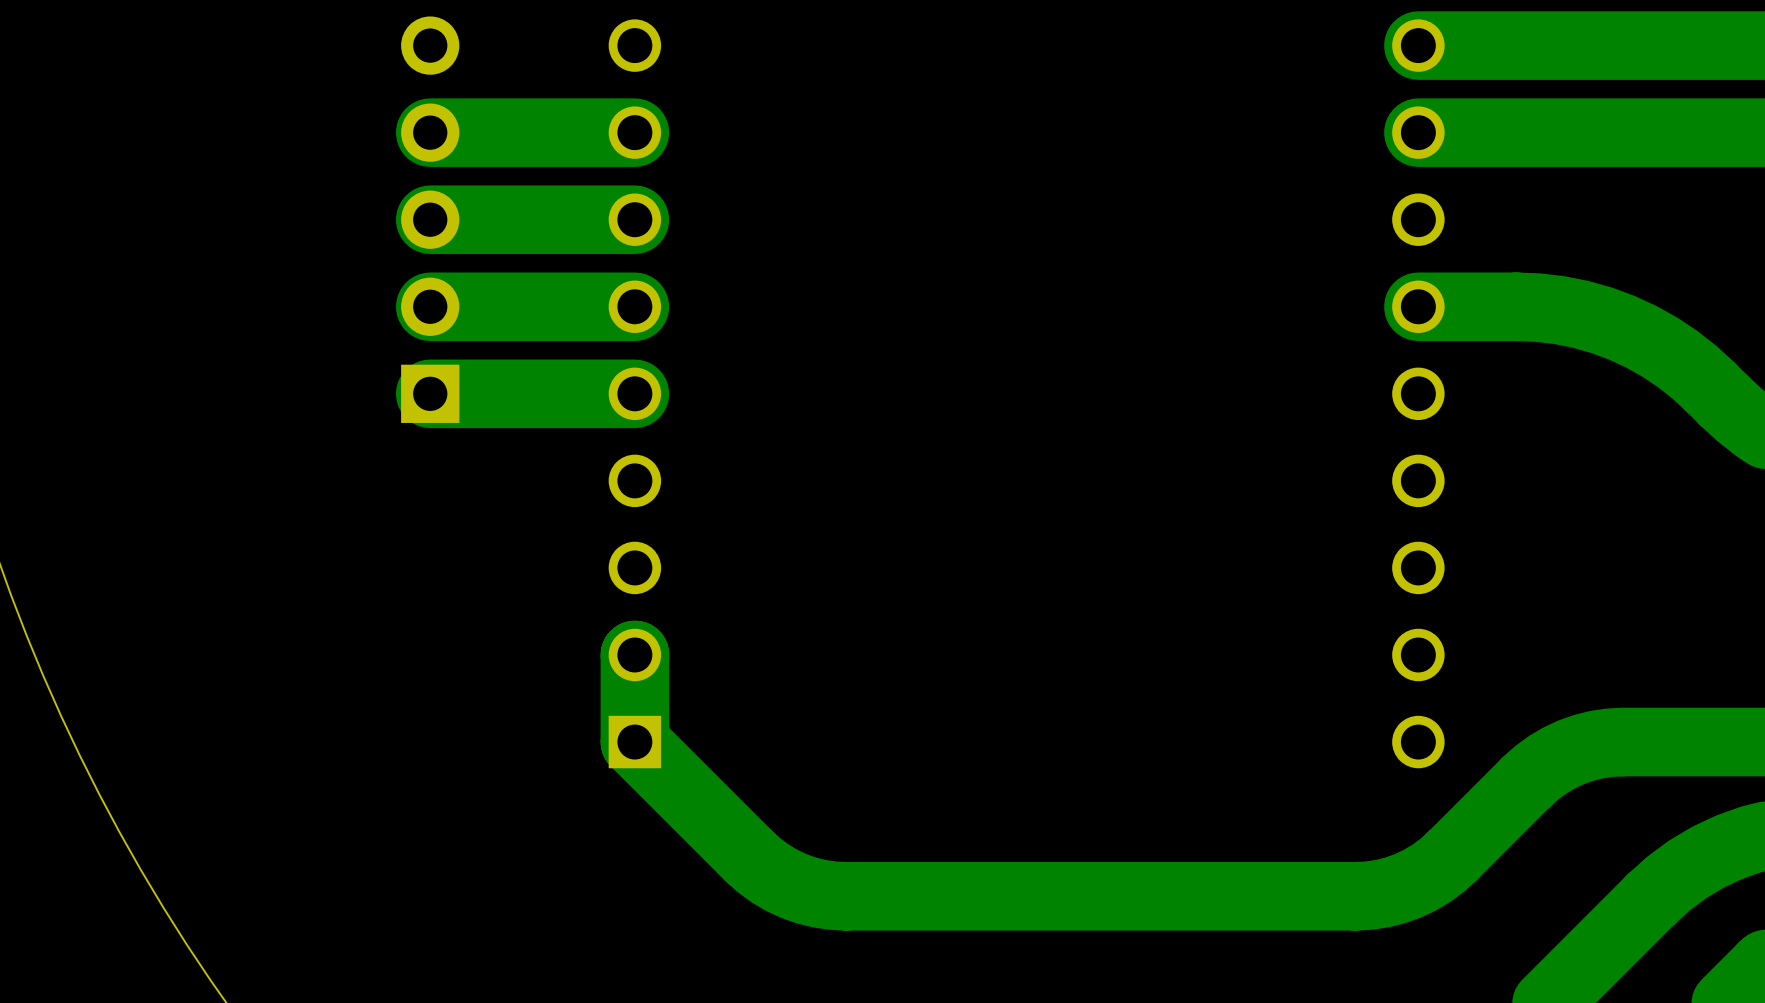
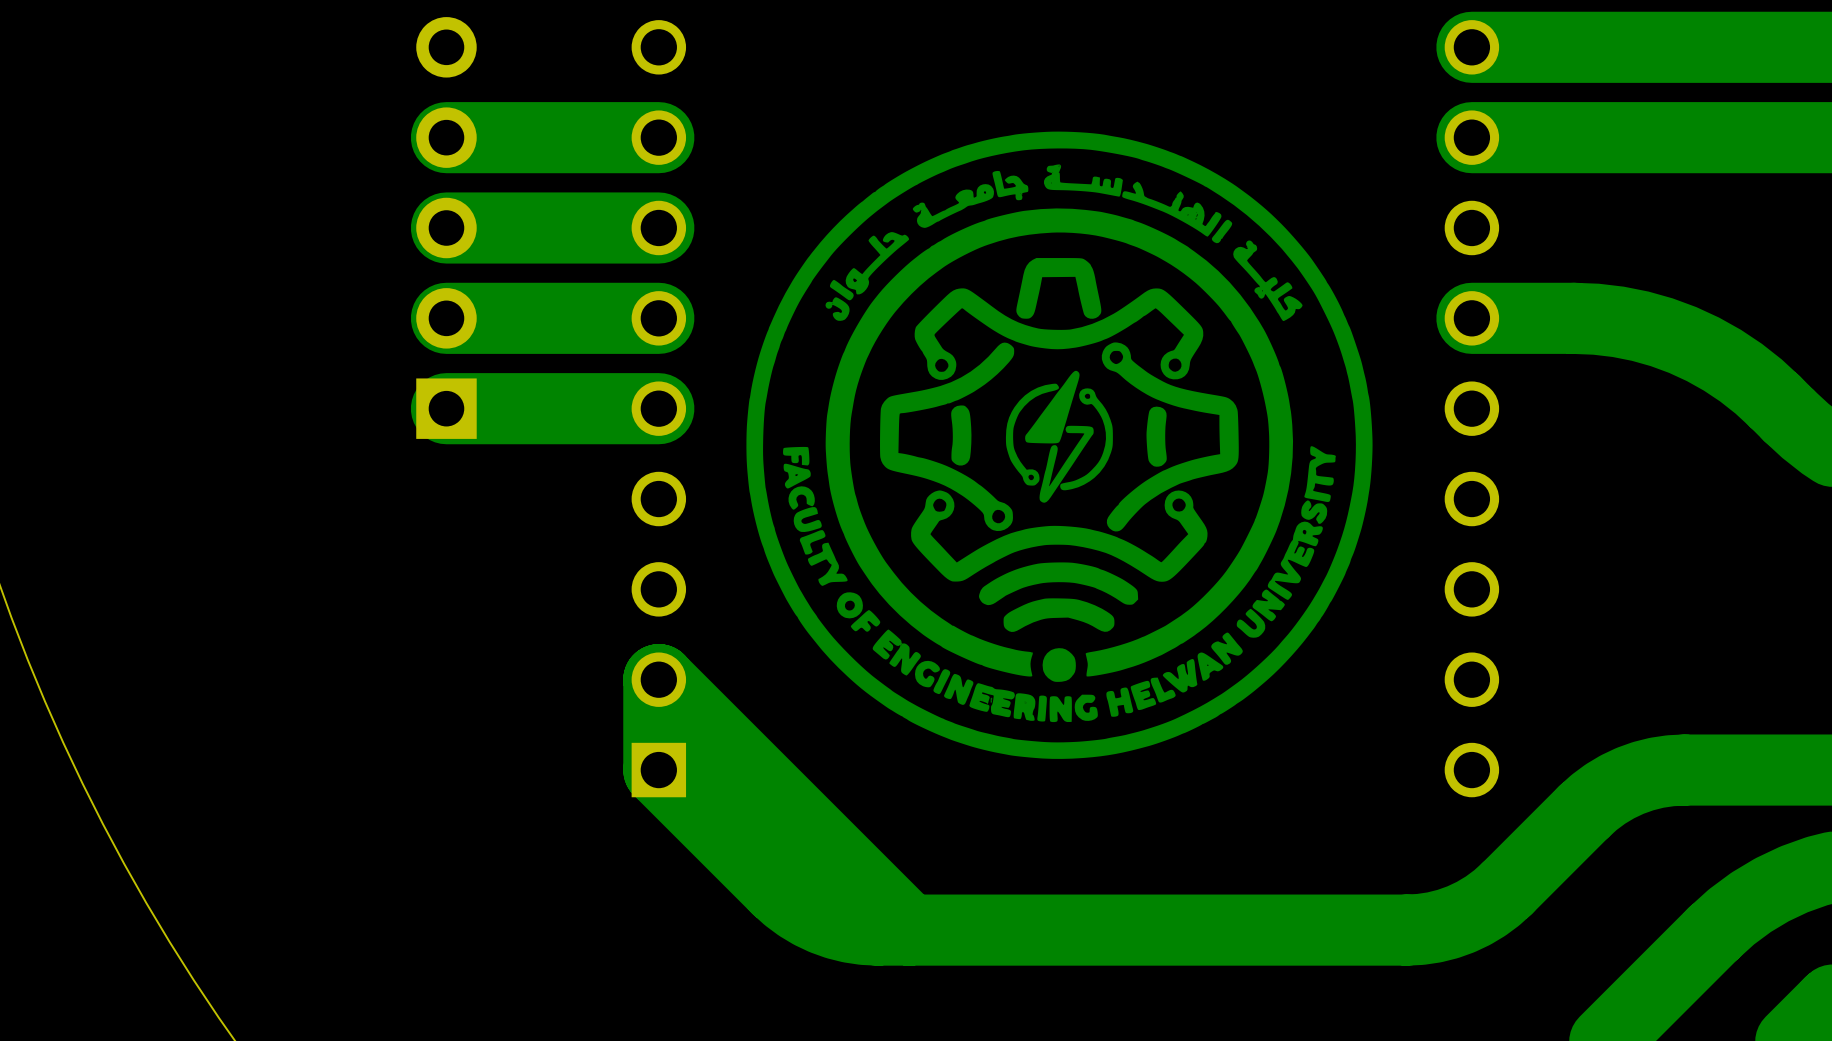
drawing: none -> [746, 131, 1373, 759]
track: none -> (658, 679) (909, 930)

